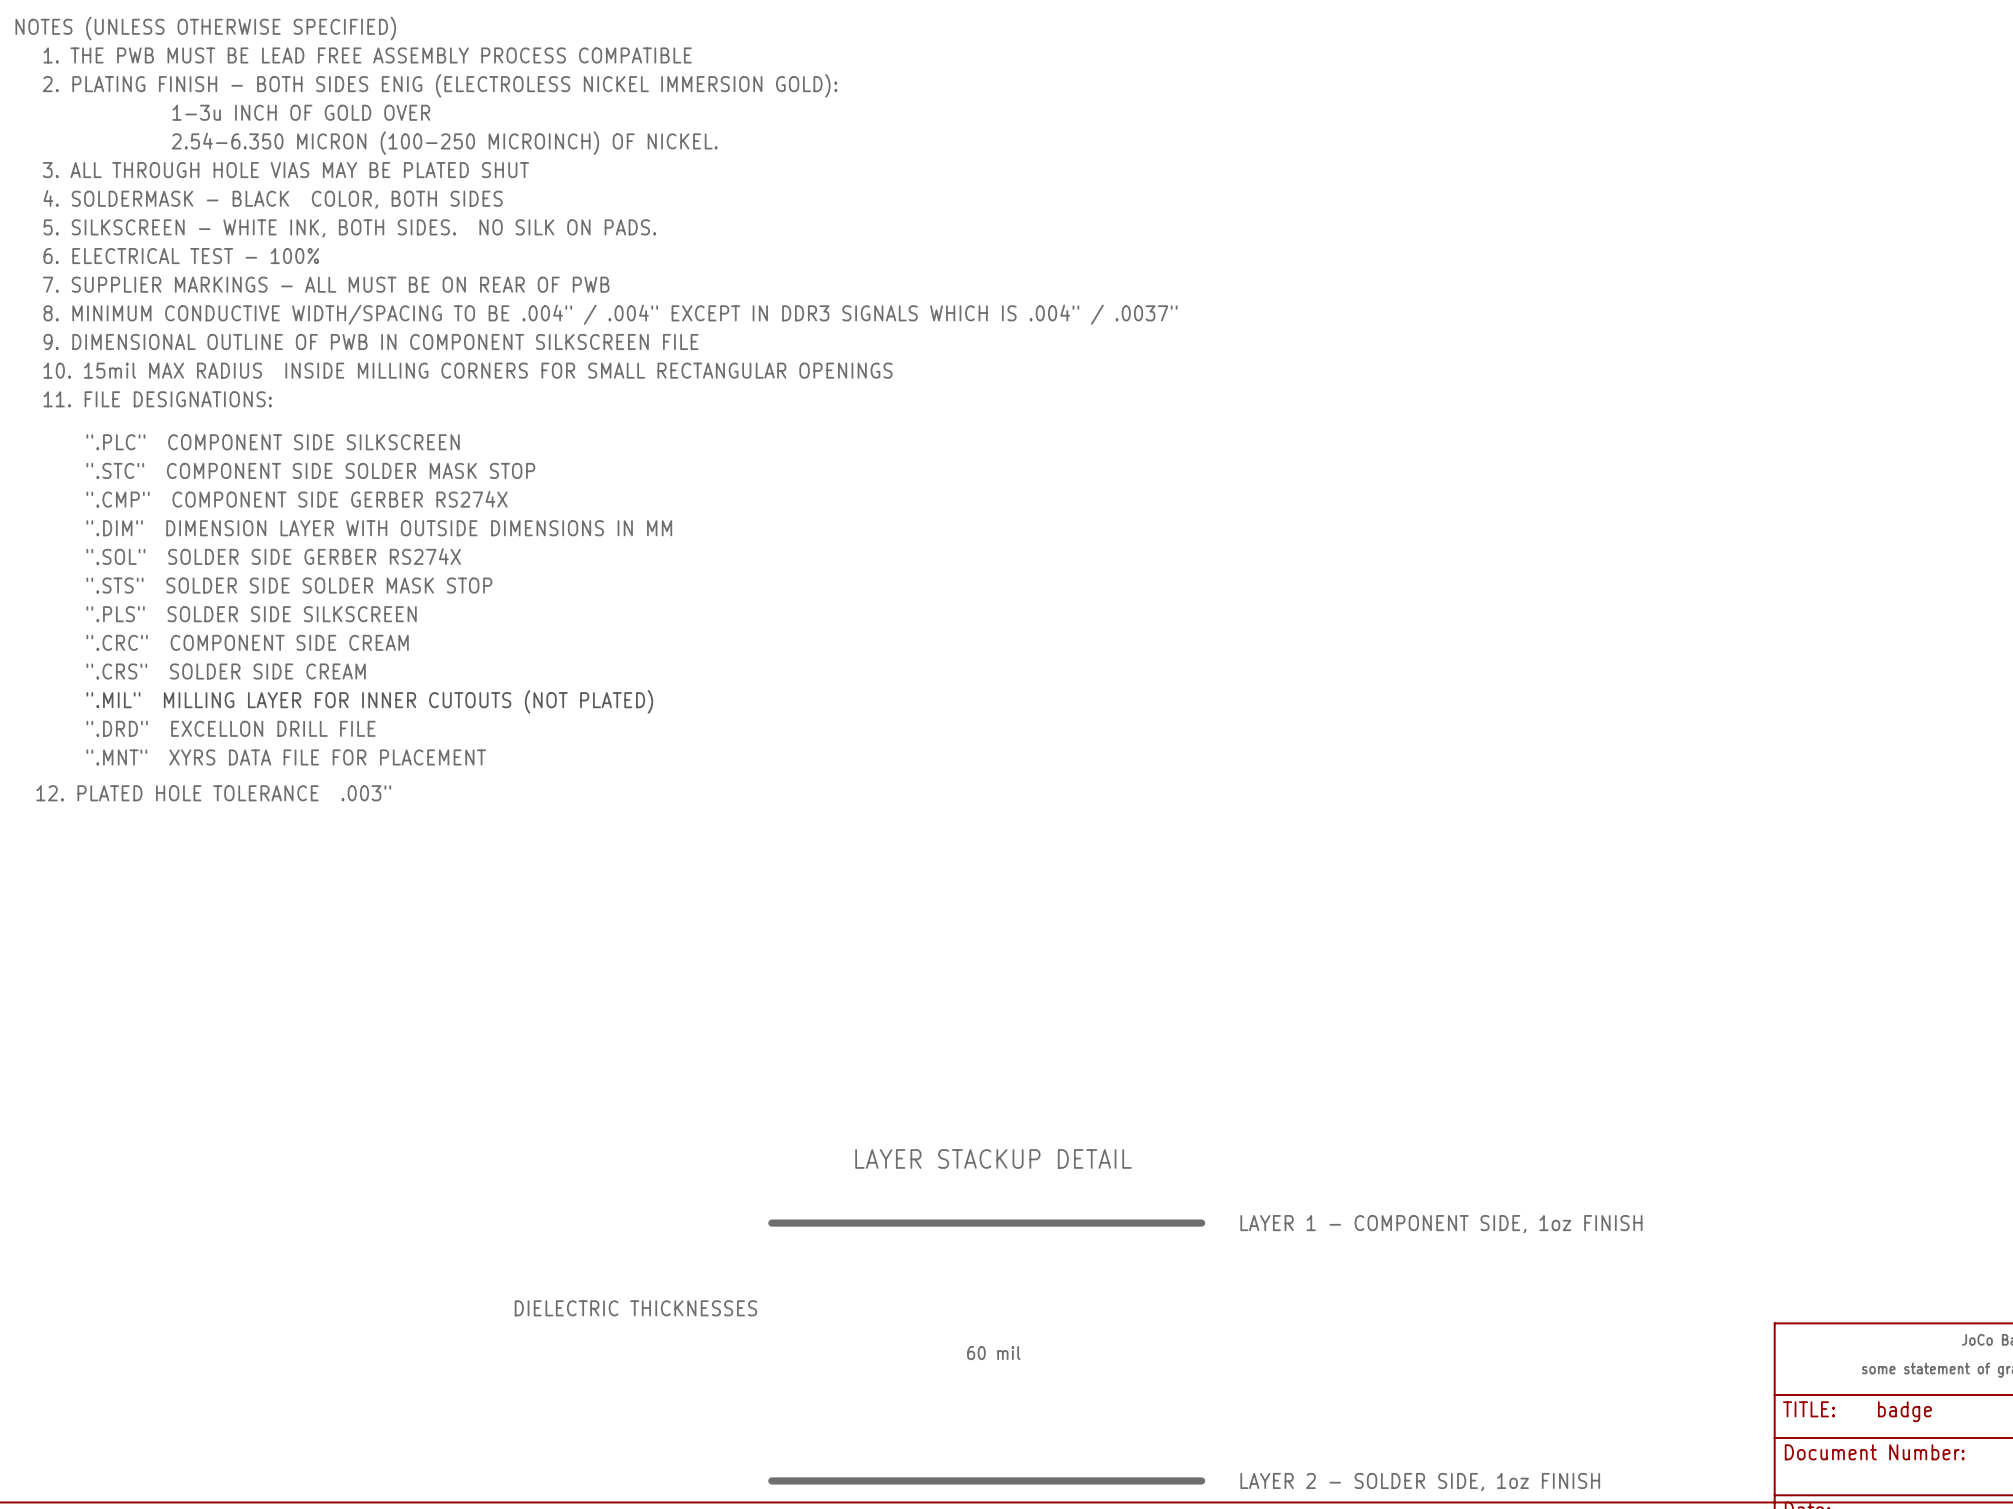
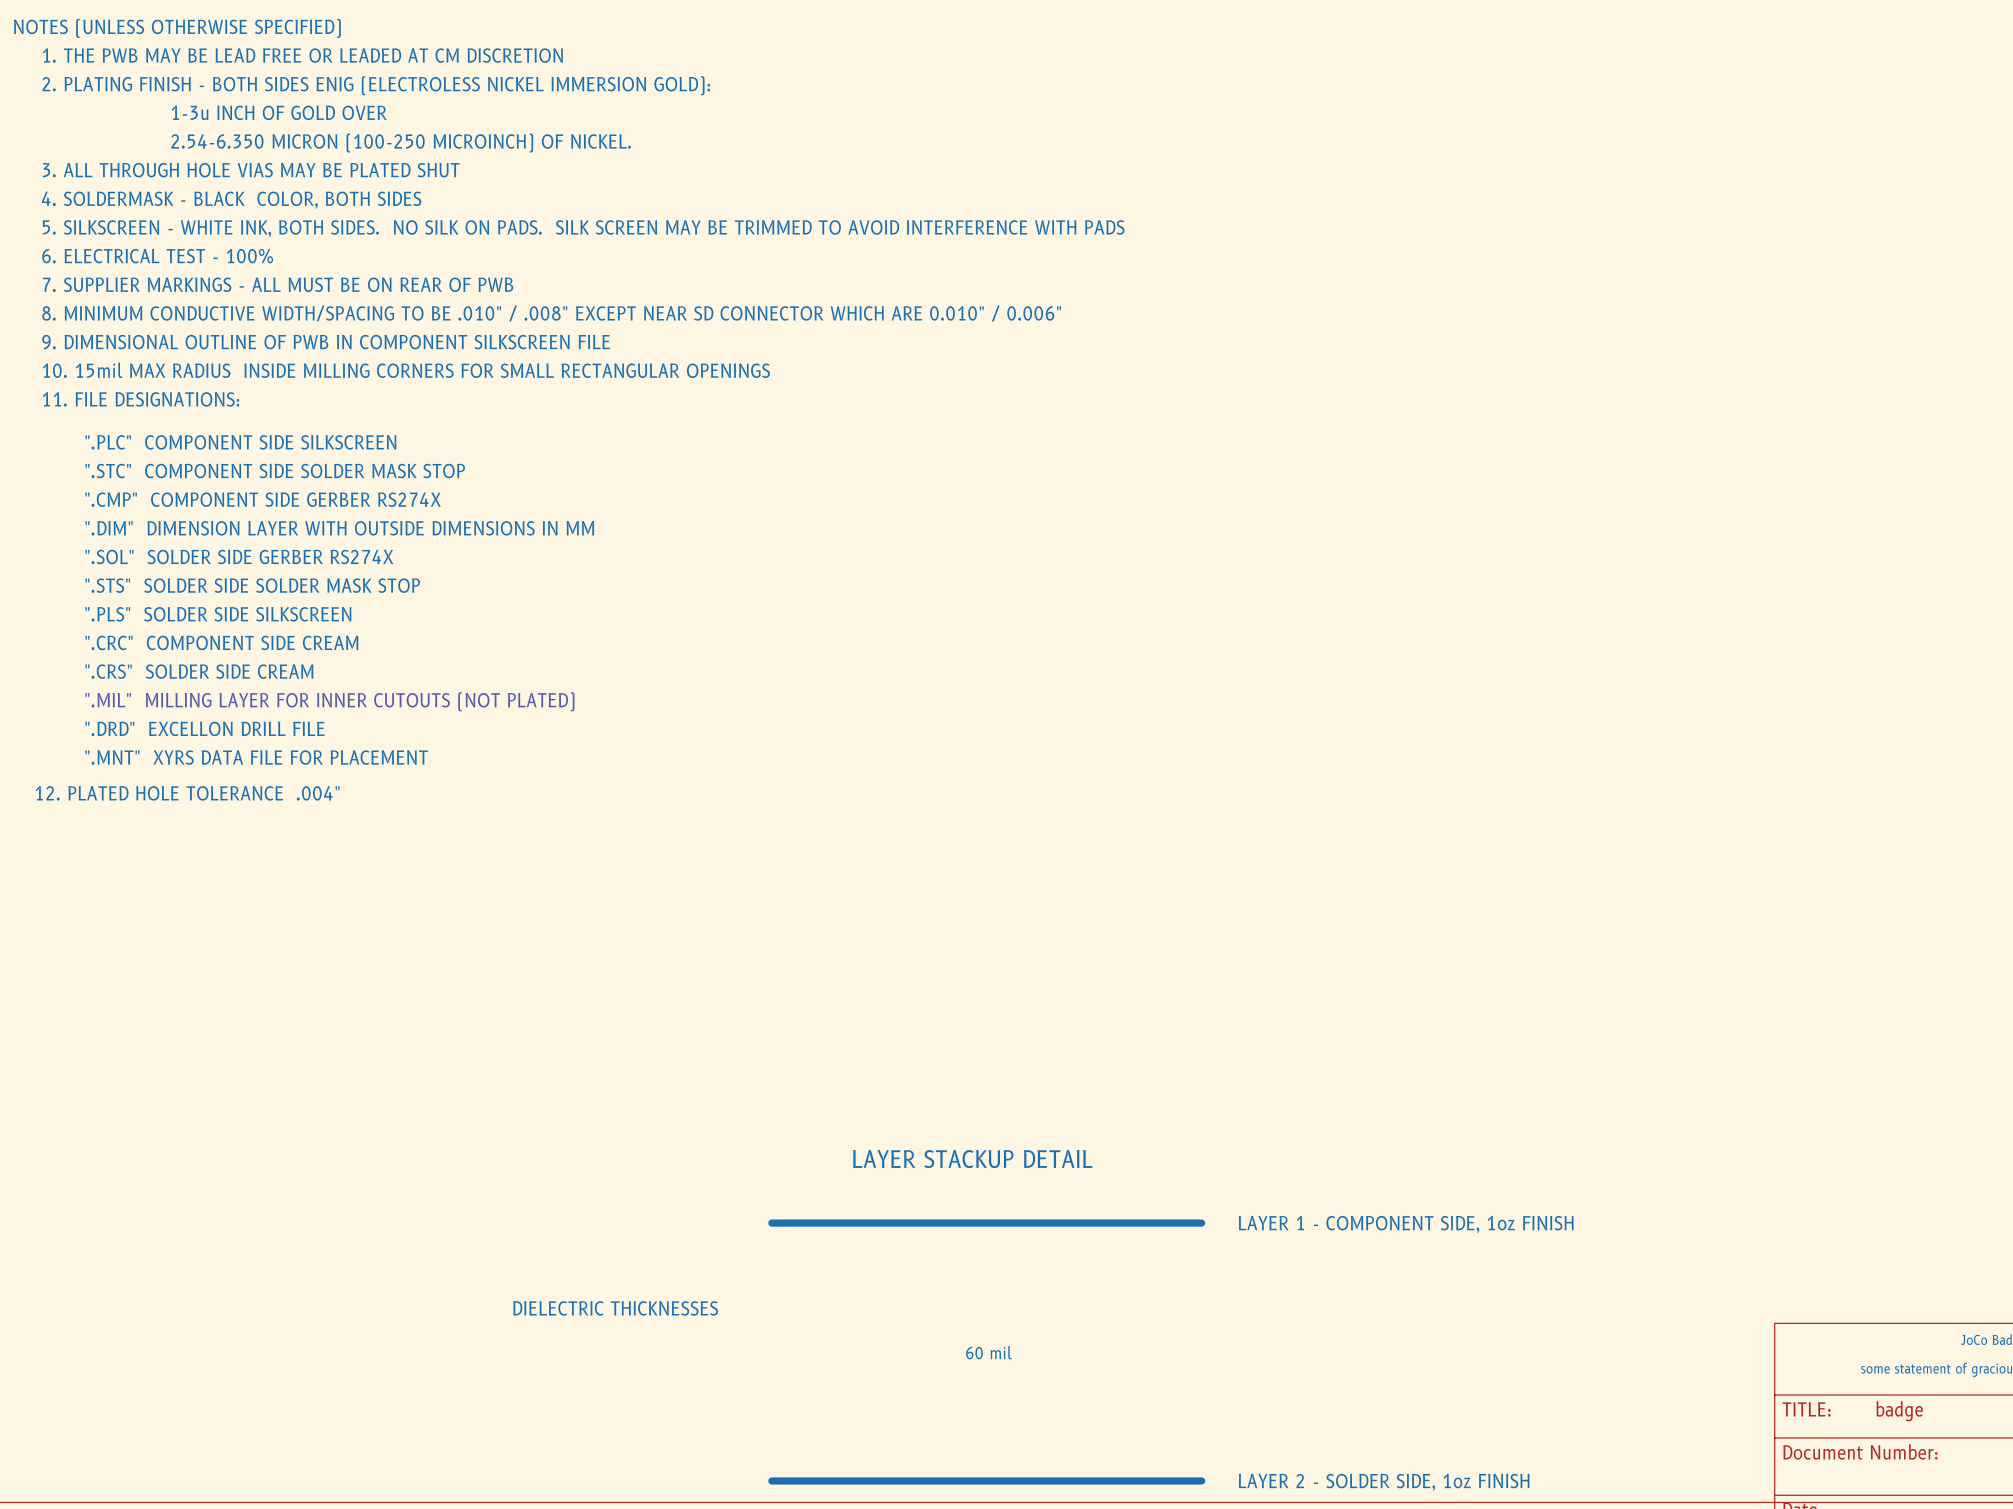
text: 1. THE PWB MUST BE LEAD FREE ASSEMBLY PROCESS COMPATIBLE (367, 55) -> 1. THE PWB MAY BE LEAD FREE OR LEADED AT CM DISCRETION (302, 55)
text: 5. SILKSCREEN - WHITE INK, BOTH SIDES. NO SILK ON PADS. (349, 228) -> 5. SILKSCREEN - WHITE INK, BOTH SIDES. NO SILK ON PADS. SILK SCREEN MAY BE TRIMMED TO AVOID INTERFERENCE WITH PADS (583, 228)
text: 8. MINIMUM CONDUCTIVE WIDTH/SPACING TO BE .004" / .004" EXCEPT IN DDR3 SIGNALS WHICH IS .004" / .0037" (610, 314) -> 8. MINIMUM CONDUCTIVE WIDTH/SPACING TO BE .010" / .008" EXCEPT NEAR SD CONNECTOR WHICH ARE 0.010" / 0.006" (551, 313)
text: 12. PLATED HOLE TOLERANCE .003" (213, 793) -> 12. PLATED HOLE TOLERANCE .004" (187, 793)

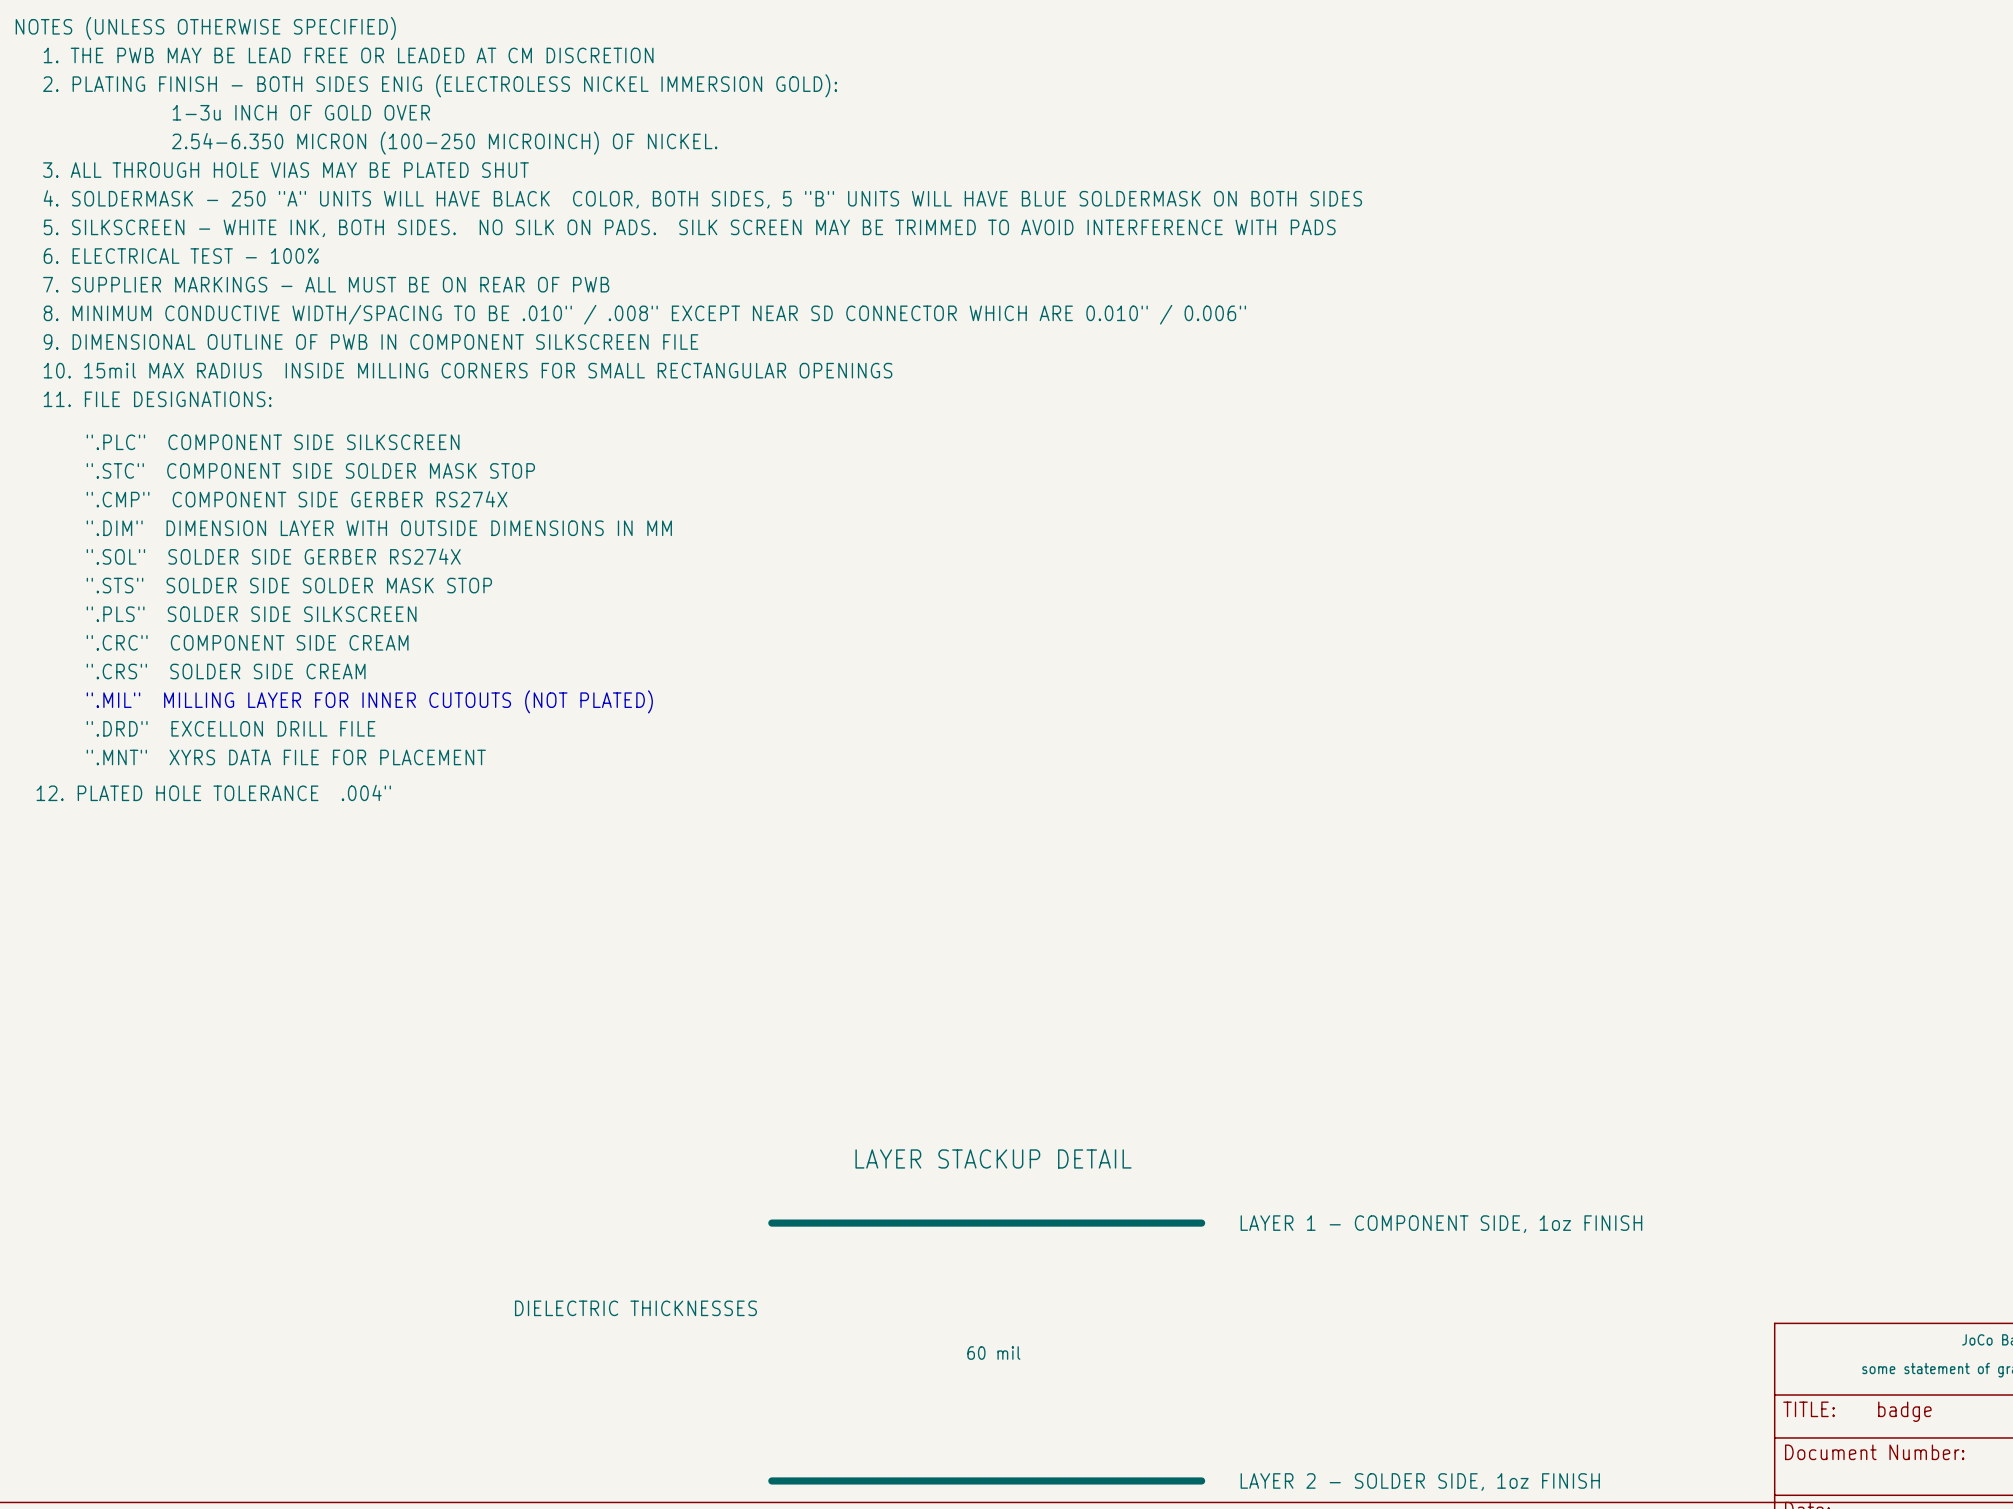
text: 4. SOLDERMASK - BLACK COLOR, BOTH SIDES (231, 200) -> 4. SOLDERMASK - 250 "A" UNITS WILL HAVE BLACK COLOR, BOTH SIDES, 5 "B" UNITS WILL HAVE BLUE SOLDERMASK ON BOTH SIDES (702, 199)

